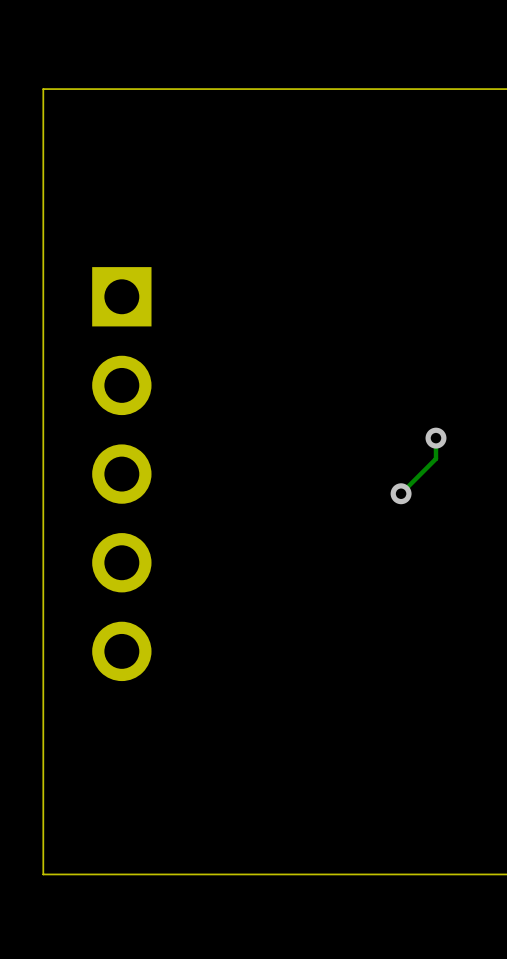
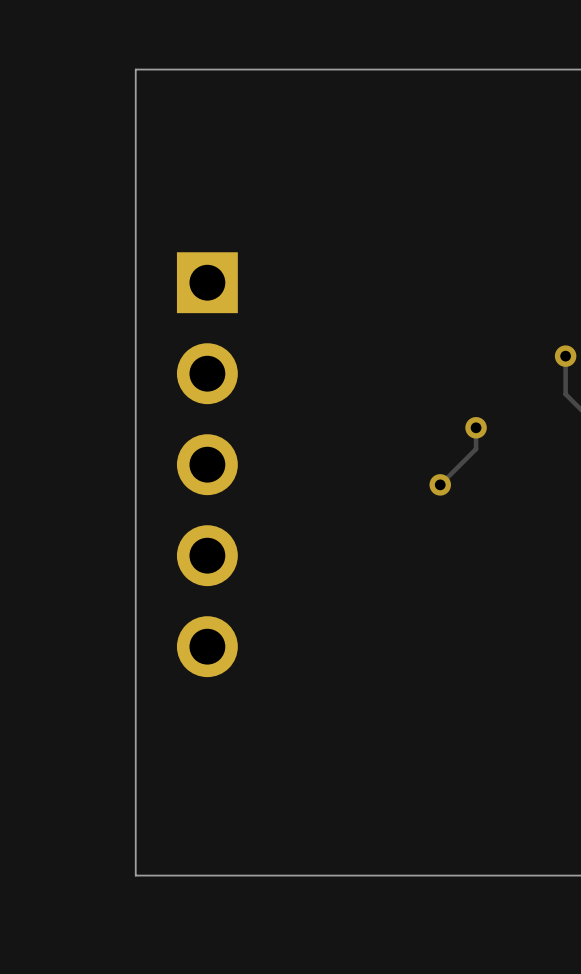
board edge: (104, 89) (43, 89) (43, 874) (104, 874) -> (135, 69) (135, 875)
part position: (121, 474) -> (207, 464)

